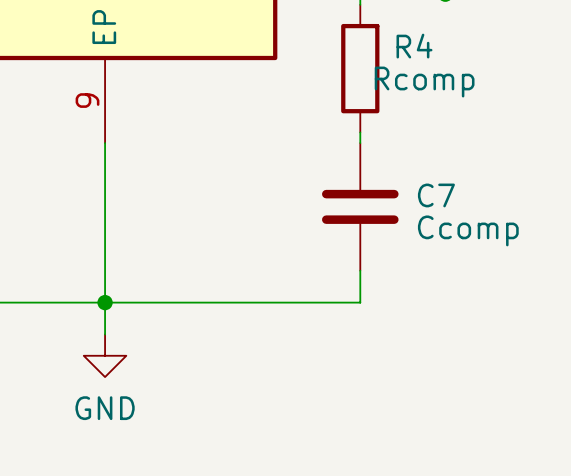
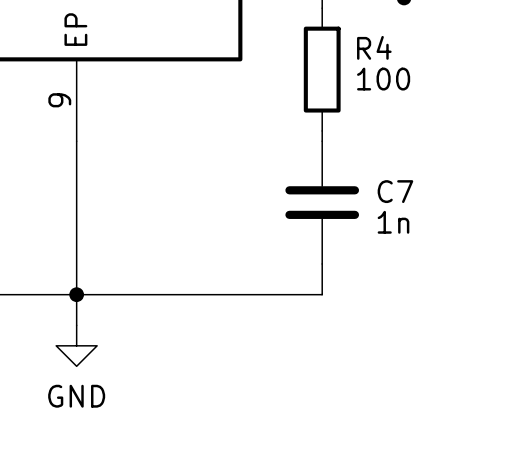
R4 value: Rcomp (424, 82) -> 100 (383, 79)
C7 value: Ccomp (468, 230) -> 1n (393, 222)

